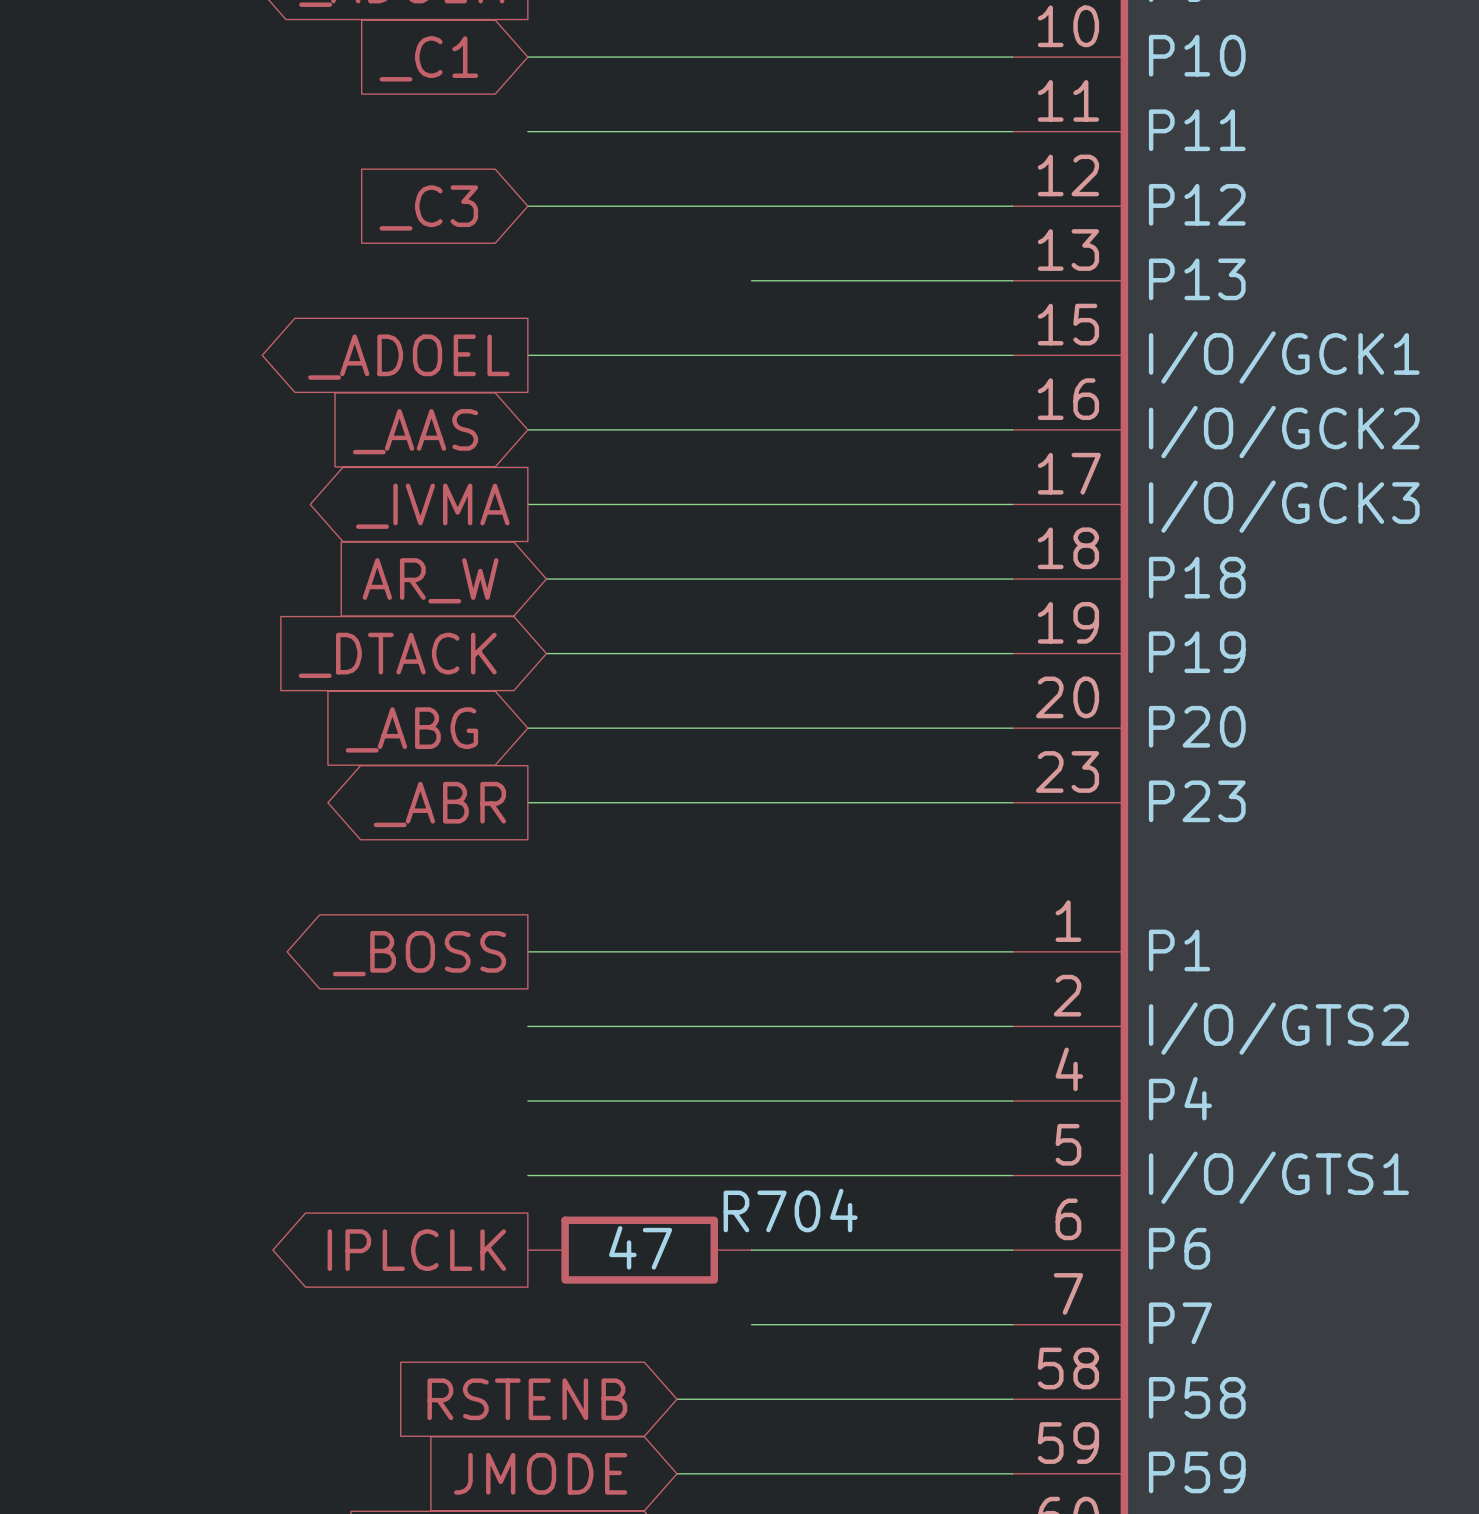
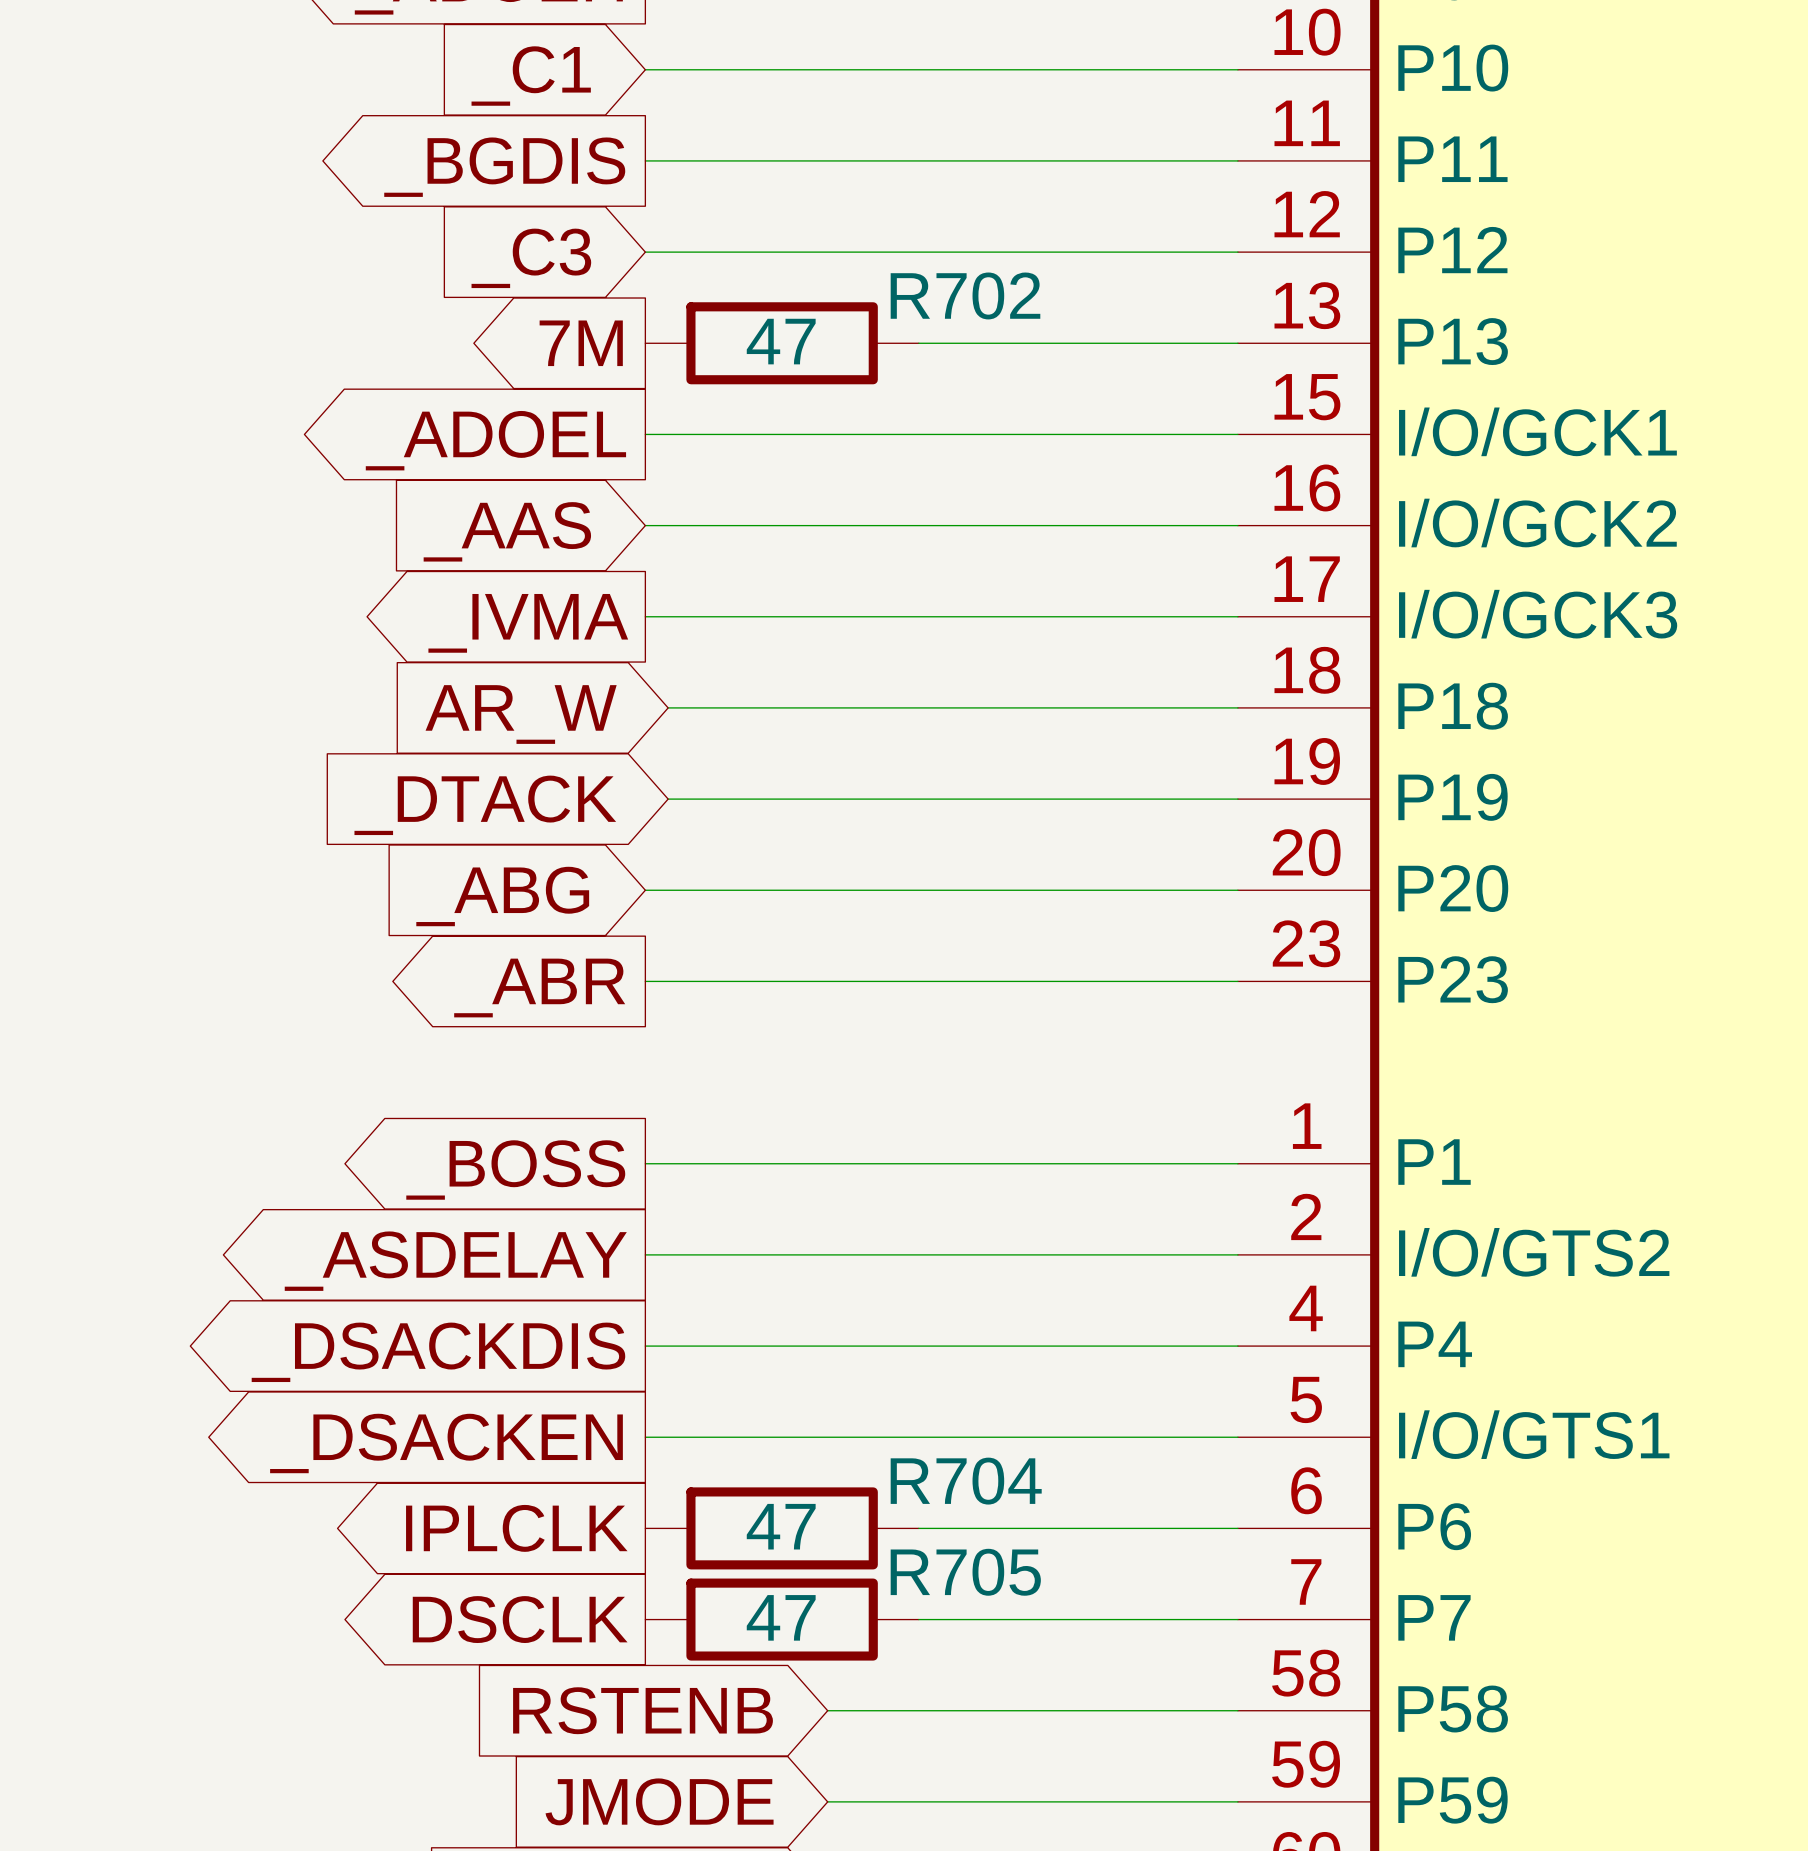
global label: none -> _BGDIS (504, 167)
global label: none -> 7M (581, 343)
R702: none -> 47 (782, 343)
global label: none -> _ASDELAY (455, 1261)
global label: none -> _DSACKDIS (438, 1352)
global label: none -> _DSACKEN (446, 1443)
global label: none -> DSCLK (520, 1619)
R705: none -> 47 (782, 1619)

